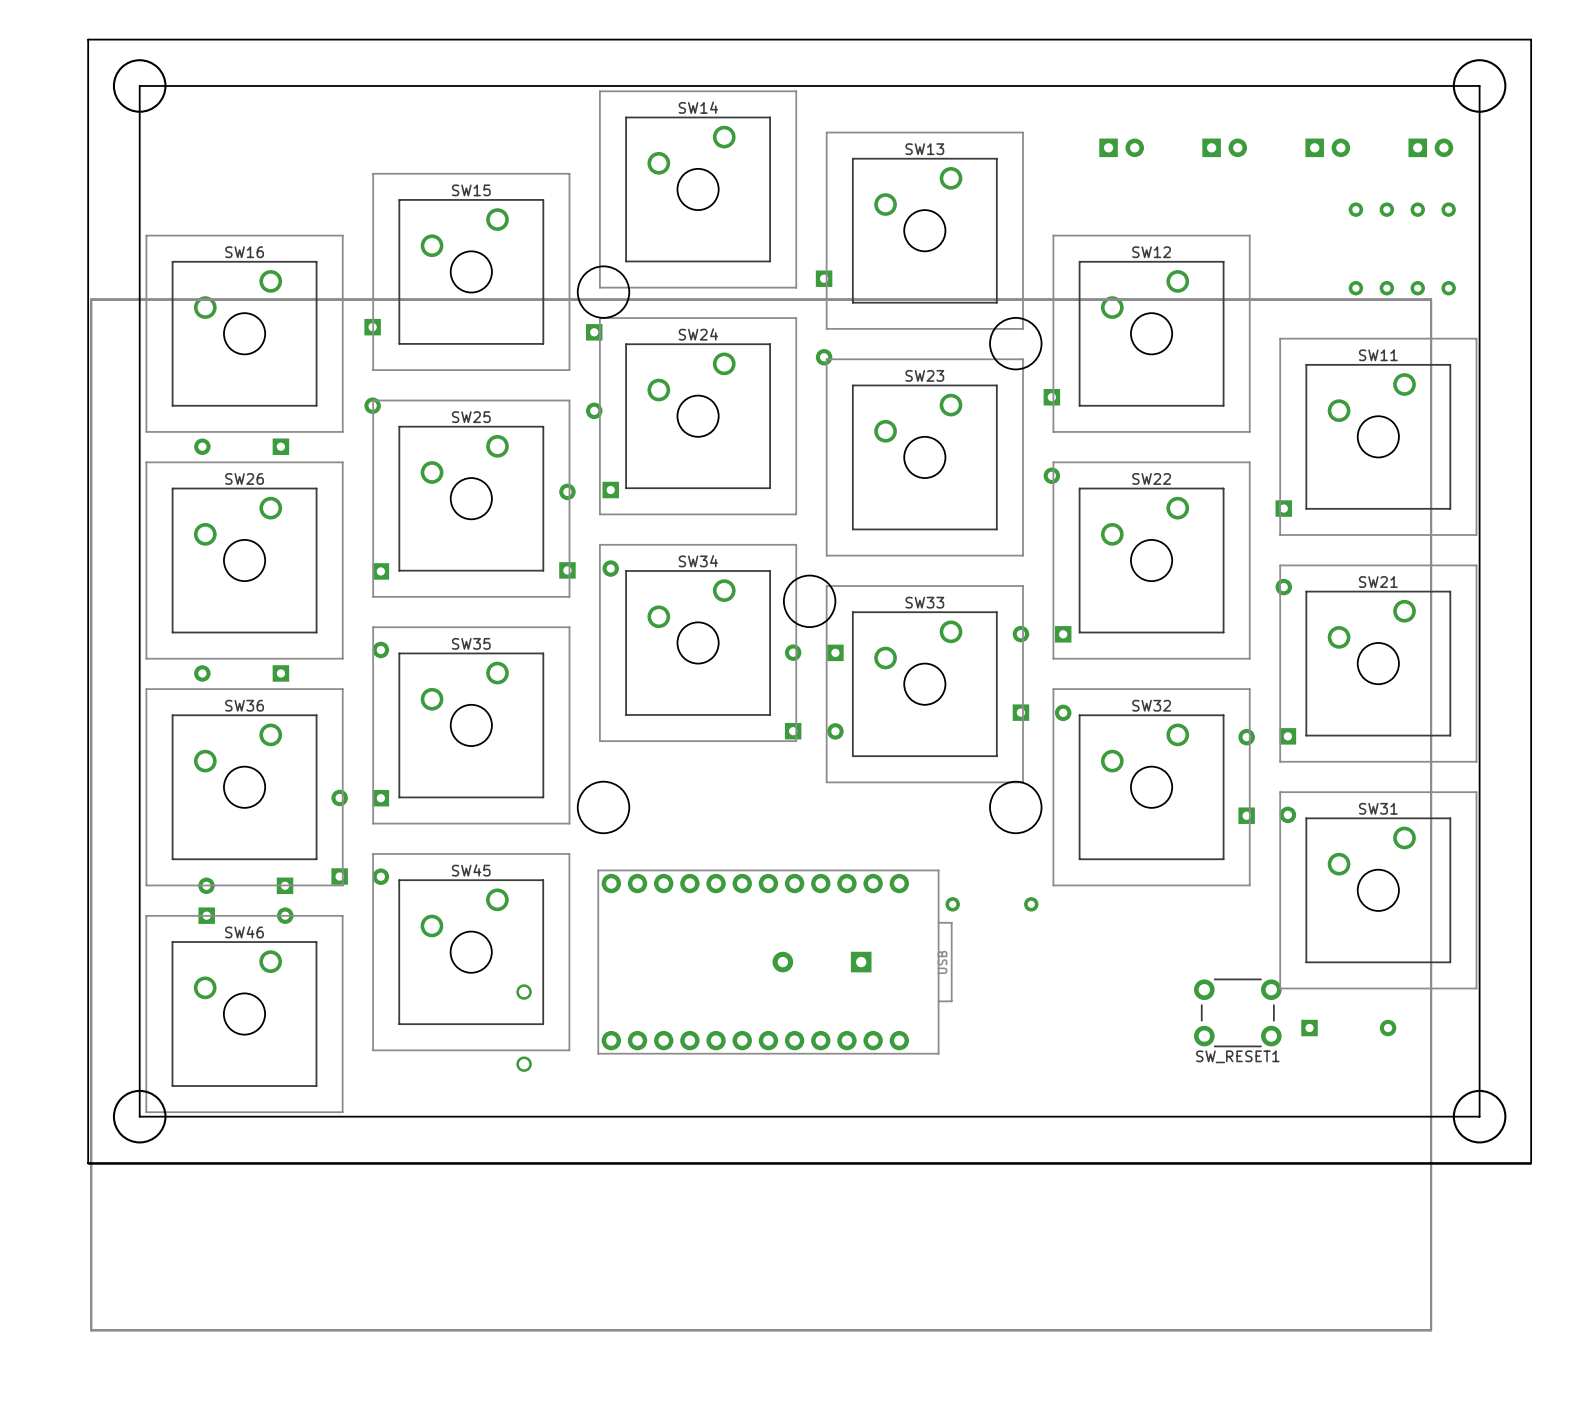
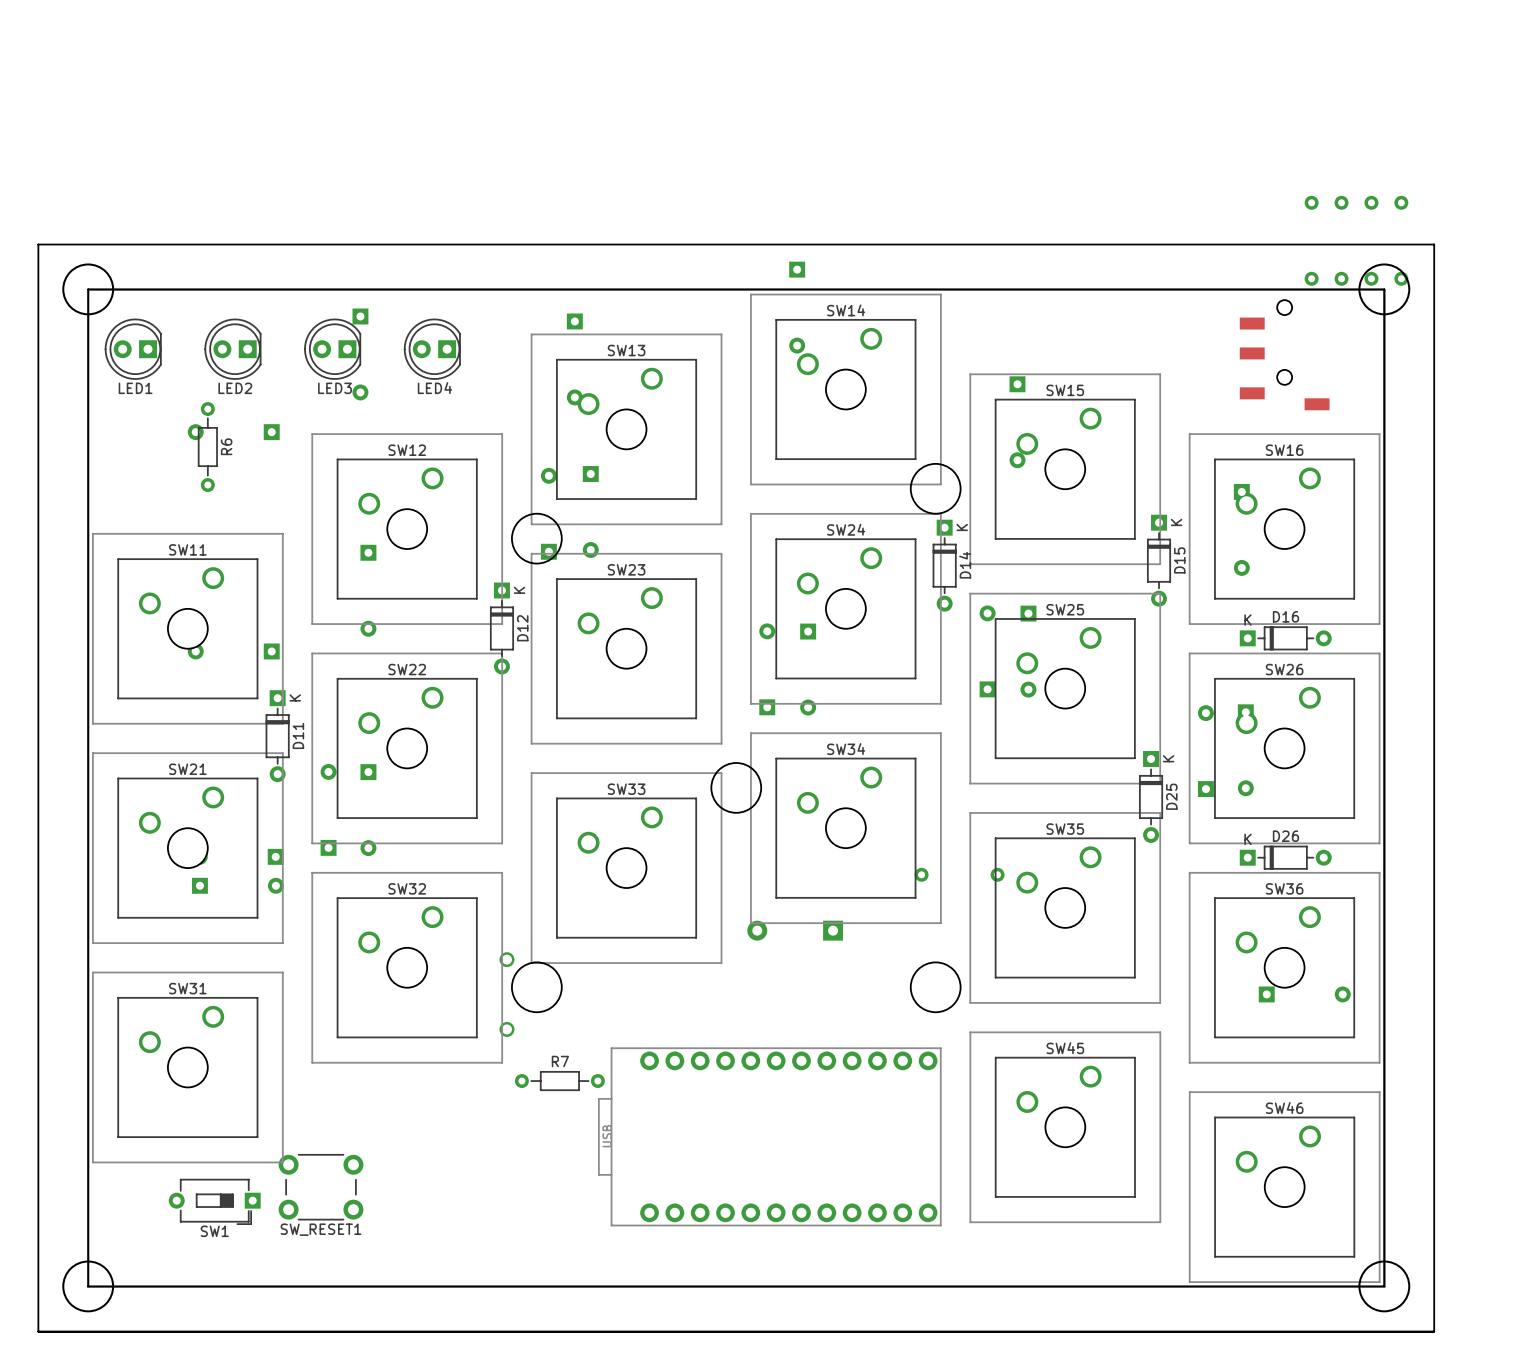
board edge: (139, 85) (139, 1116) (1479, 1116) (1479, 85) (139, 85) -> (88, 289) (88, 1286) (1384, 1286) (1384, 289) (88, 289)
round board edge position: (139, 85) -> (88, 289)
round board edge position: (1479, 85) -> (1384, 289)
part: (1121, 147) -> none
part: (1224, 147) -> none
part: (1327, 147) -> none
part: (1430, 147) -> none
SW14 position: (698, 189) -> (845, 389)
SW13 position: (924, 230) -> (626, 429)
round board edge: [577, 265, 630, 319] -> none
SW15 position: (471, 271) -> (1065, 469)
round board edge: [989, 317, 1043, 370] -> none
SW16 position: (244, 333) -> (1284, 529)
SW12 position: (1151, 333) -> (407, 529)
LED1: none -> (133, 349)
LED2: none -> (232, 349)
LED3: none -> (332, 349)
LED4: none -> (432, 349)
part: none -> (1284, 355)
SW24 position: (698, 416) -> (845, 608)
SW11 position: (1378, 436) -> (187, 628)
SW23 position: (924, 457) -> (626, 648)
R6: none -> (207, 447)
round board edge: none -> [910, 463, 962, 515]
SW25 position: (471, 498) -> (1065, 688)
round board edge: none -> [511, 513, 563, 565]
SW26 position: (244, 560) -> (1284, 748)
SW22 position: (1151, 560) -> (407, 748)
round board edge: [783, 575, 836, 628] -> none
D15: none -> (1159, 560)
D14: none -> (944, 565)
SW34 position: (698, 642) -> (845, 828)
D12: none -> (501, 628)
D16: none -> (1285, 638)
SW21 position: (1378, 663) -> (187, 848)
SW33 position: (924, 684) -> (626, 868)
SW35 position: (471, 725) -> (1065, 907)
D11: none -> (277, 736)
round board edge: [577, 781, 630, 834] -> none
round board edge: [989, 781, 1043, 834] -> none
SW36 position: (244, 787) -> (1284, 967)
SW32 position: (1151, 787) -> (407, 967)
round board edge: none -> [710, 762, 762, 814]
D25: none -> (1151, 796)
D26: none -> (1285, 857)
SW31 position: (1378, 890) -> (187, 1067)
SW45 position: (471, 952) -> (1065, 1127)
part rotation: 0° (774, 962) -> 180° (769, 1136)
part position: (774, 962) -> (769, 1136)
round board edge: none -> [511, 961, 563, 1013]
round board edge: none -> [910, 961, 962, 1013]
SW_RESET1 position: (1237, 1012) -> (321, 1187)
SW46 position: (244, 1014) -> (1284, 1187)
round board edge position: (139, 1116) -> (88, 1286)
round board edge position: (1479, 1116) -> (1384, 1286)
R7: none -> (559, 1081)
board edge: (88, 1163) (88, 39) (1531, 39) (1531, 1163) -> (38, 1331) (38, 244) (1434, 244) (1434, 1331)
board edge: (88, 1163) (1531, 1163) -> (38, 1331) (1434, 1331)
SW1: none -> (214, 1201)

